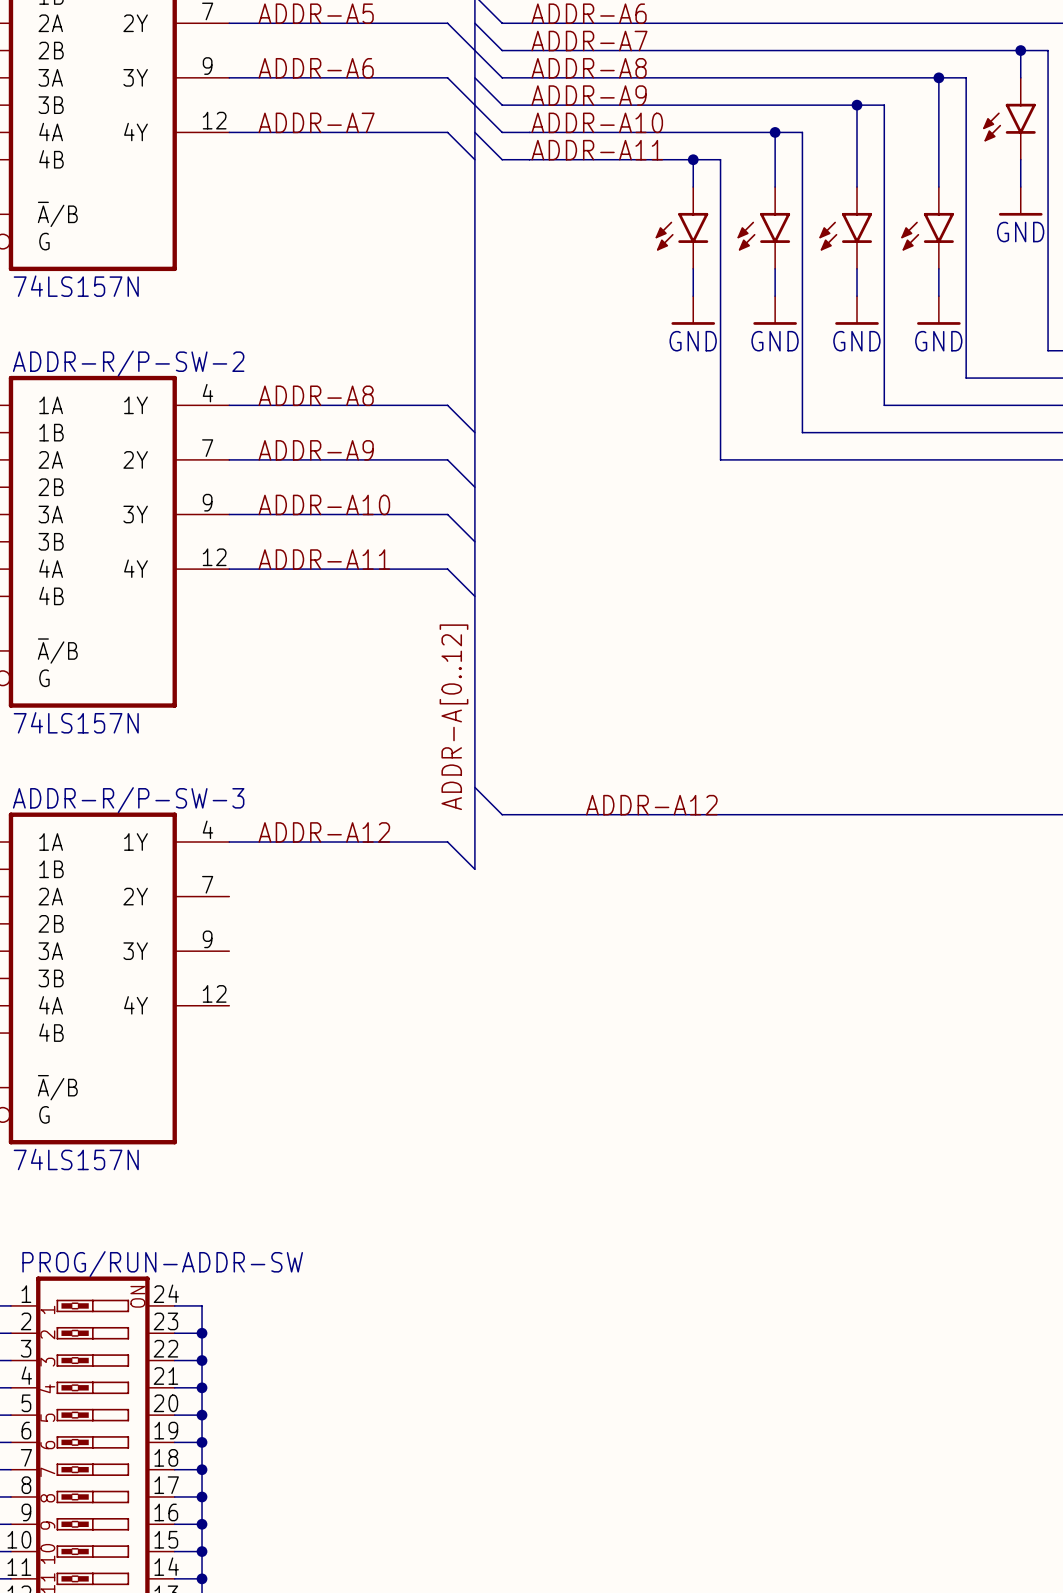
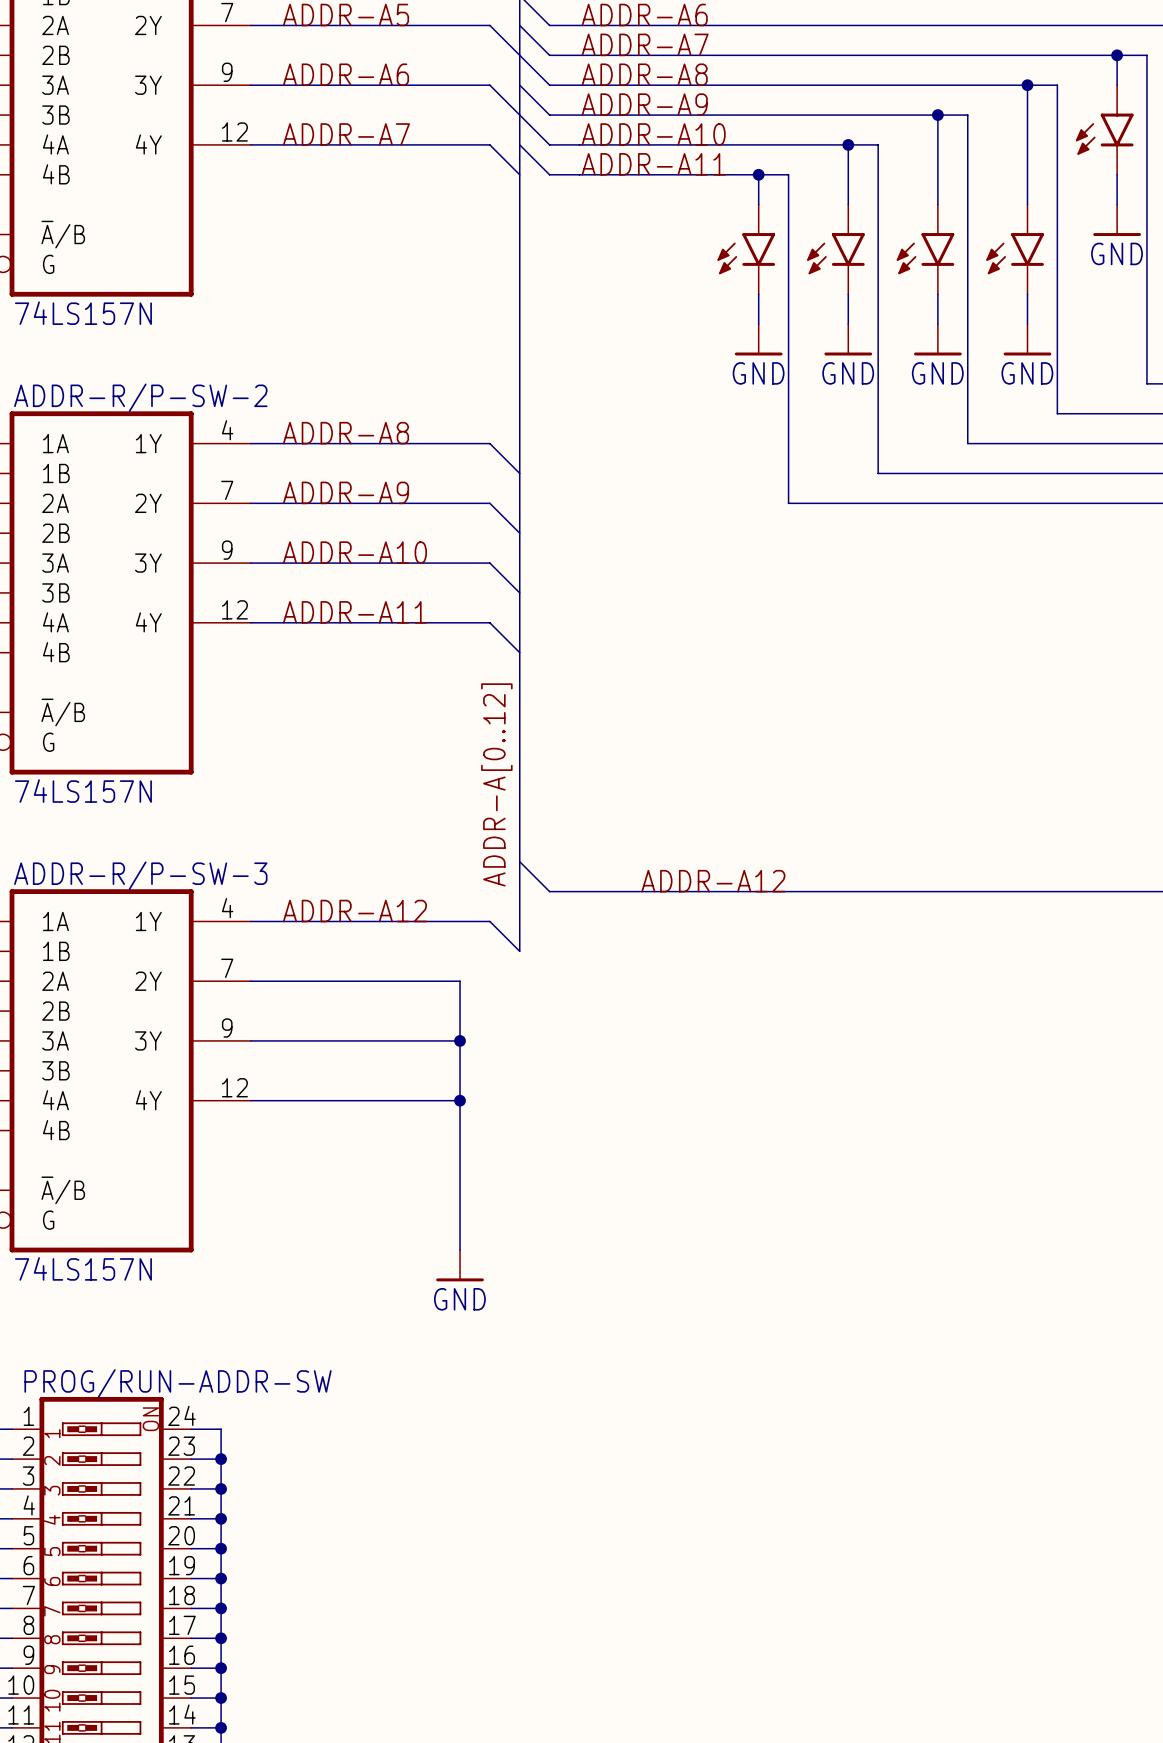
wire: none -> (250, 981) (460, 981) (460, 1250)
wire: none -> (250, 1040) (460, 1040)
junction: none -> (460, 1040)
wire: none -> (250, 1100) (460, 1100)
junction: none -> (460, 1100)
power symbol: none -> GND (460, 1265)

